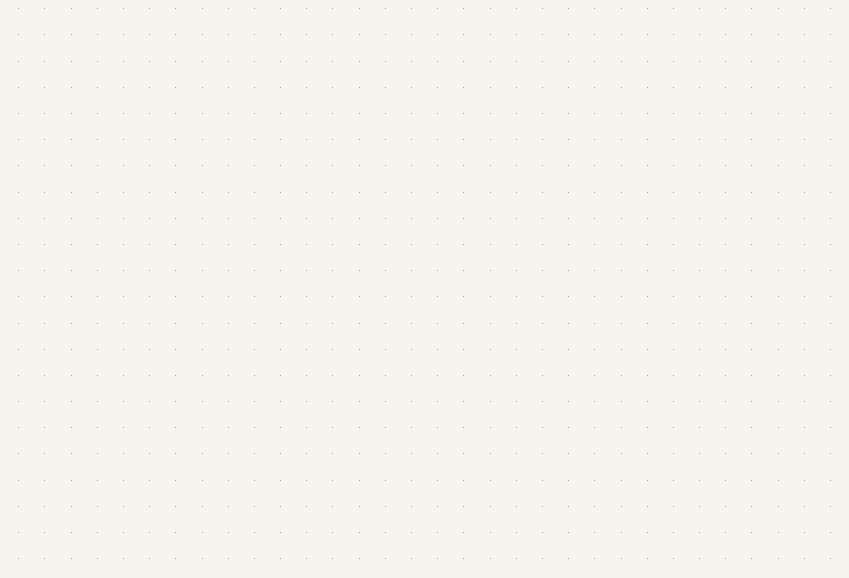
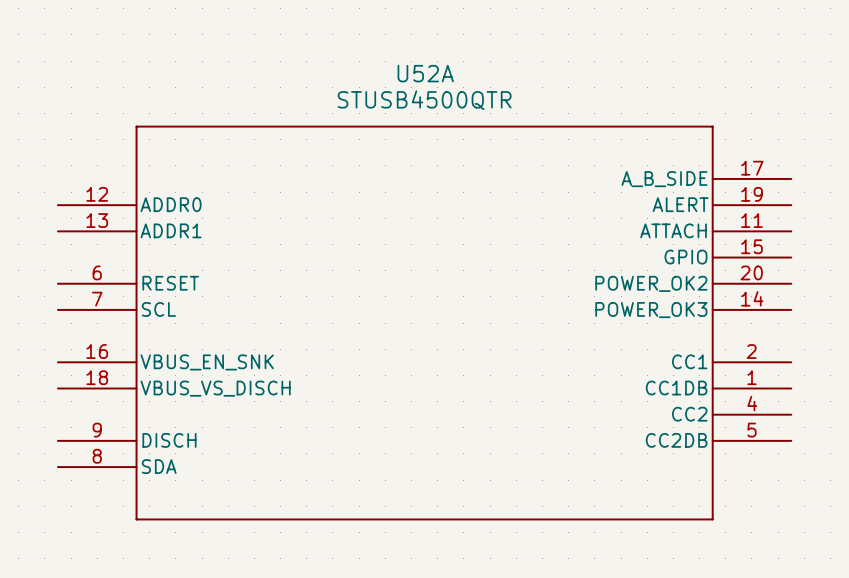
U52A: none -> STUSB4500QTR (424, 323)

